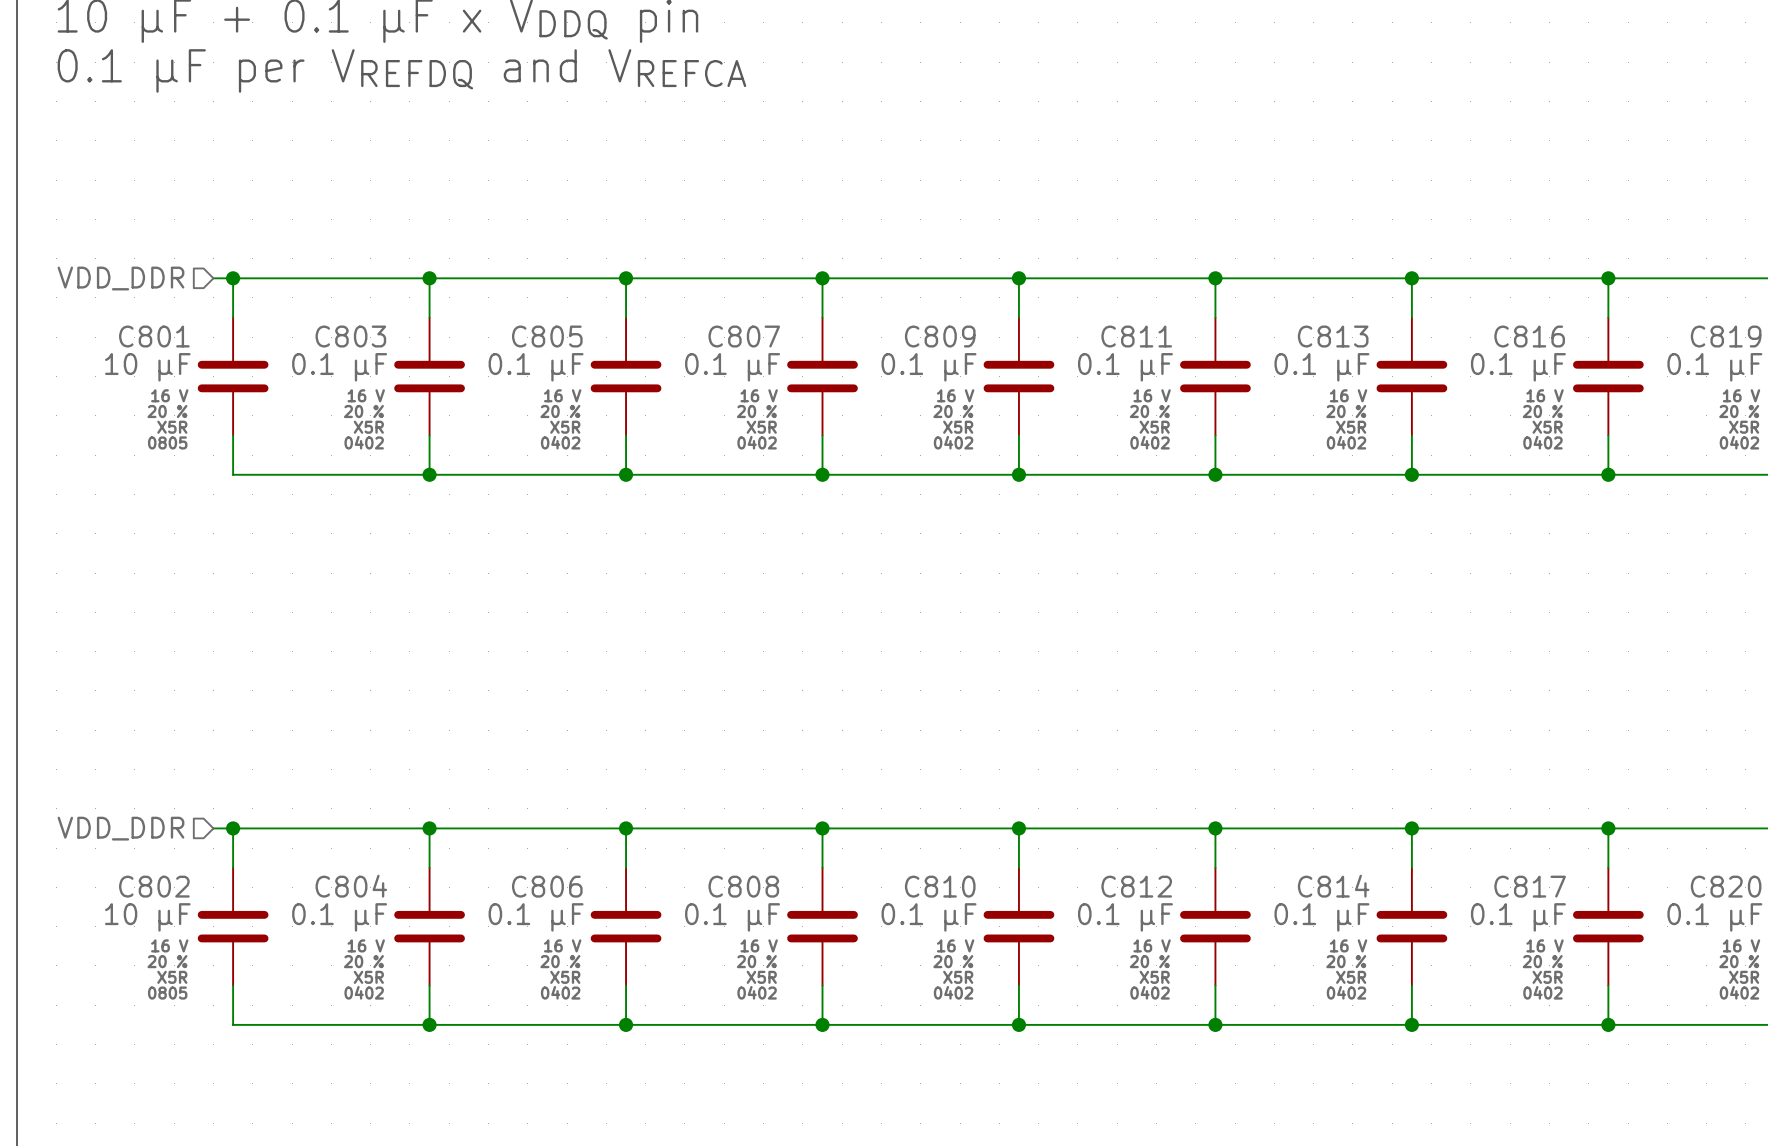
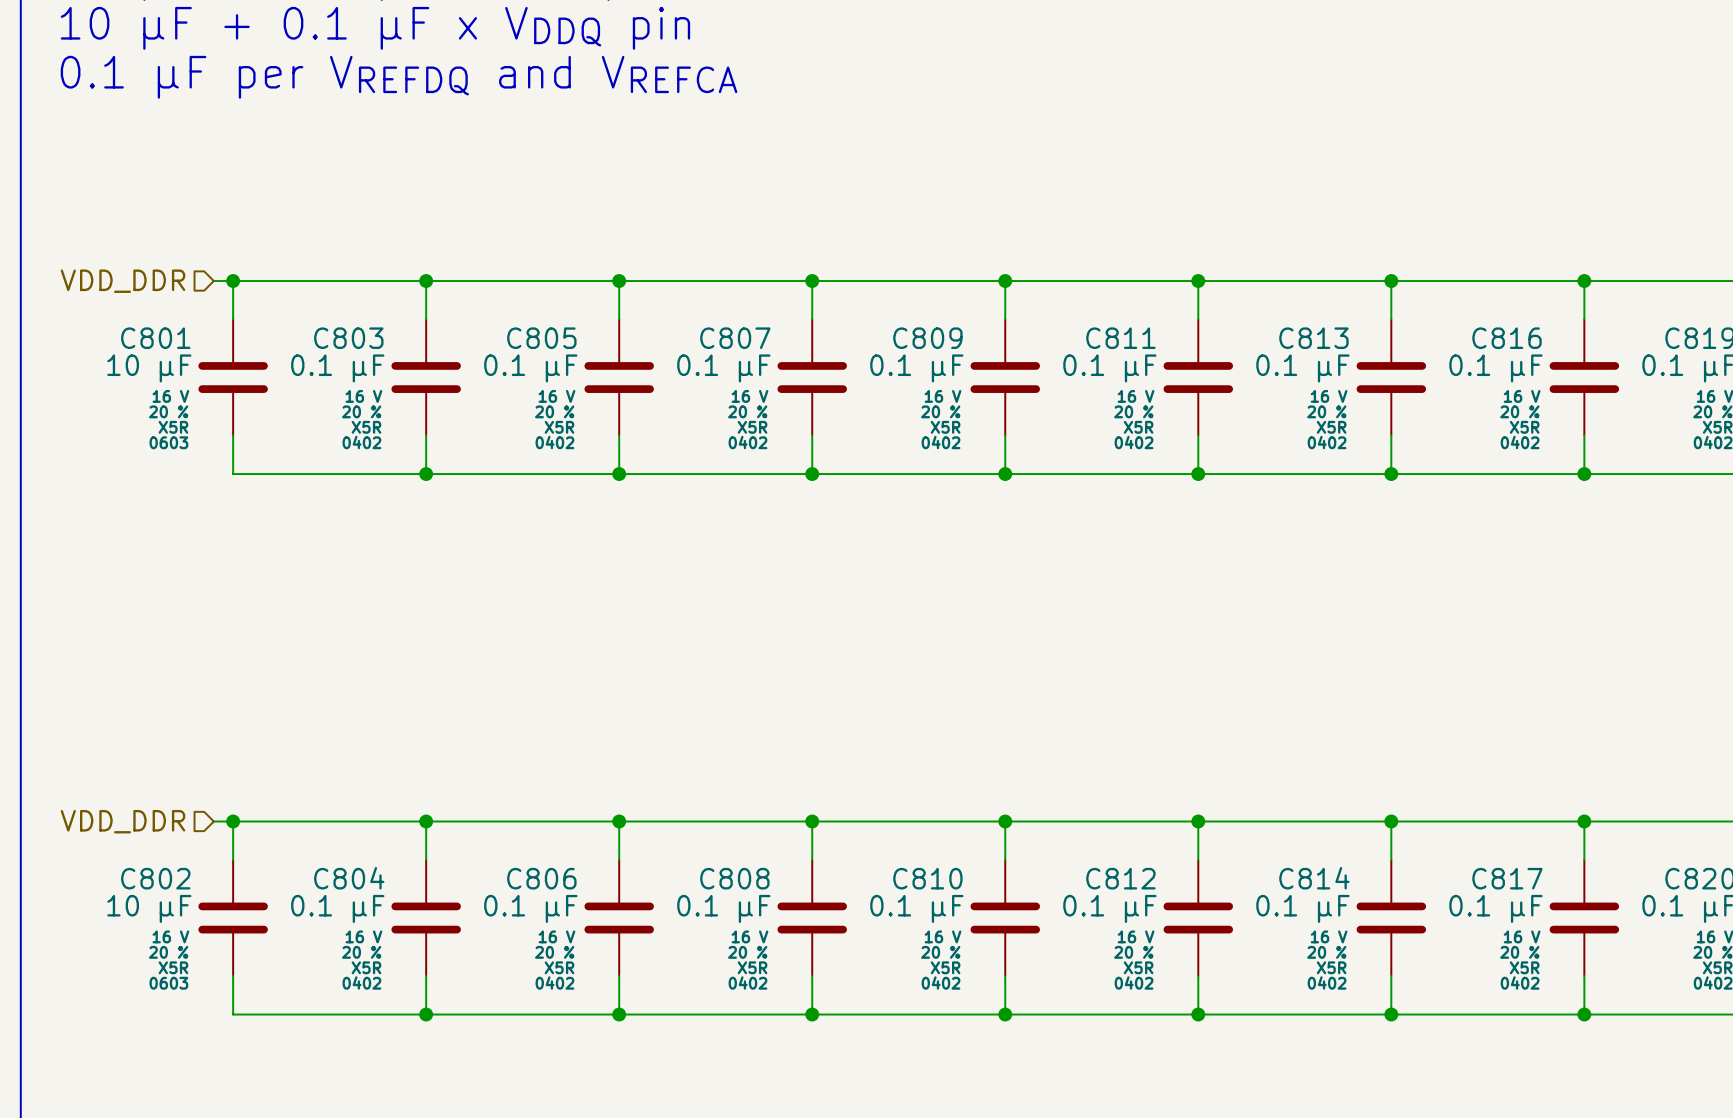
C801 text: 0805 (167, 442) -> 0603 (168, 442)
C802 text: 0805 (167, 993) -> 0603 (168, 983)

